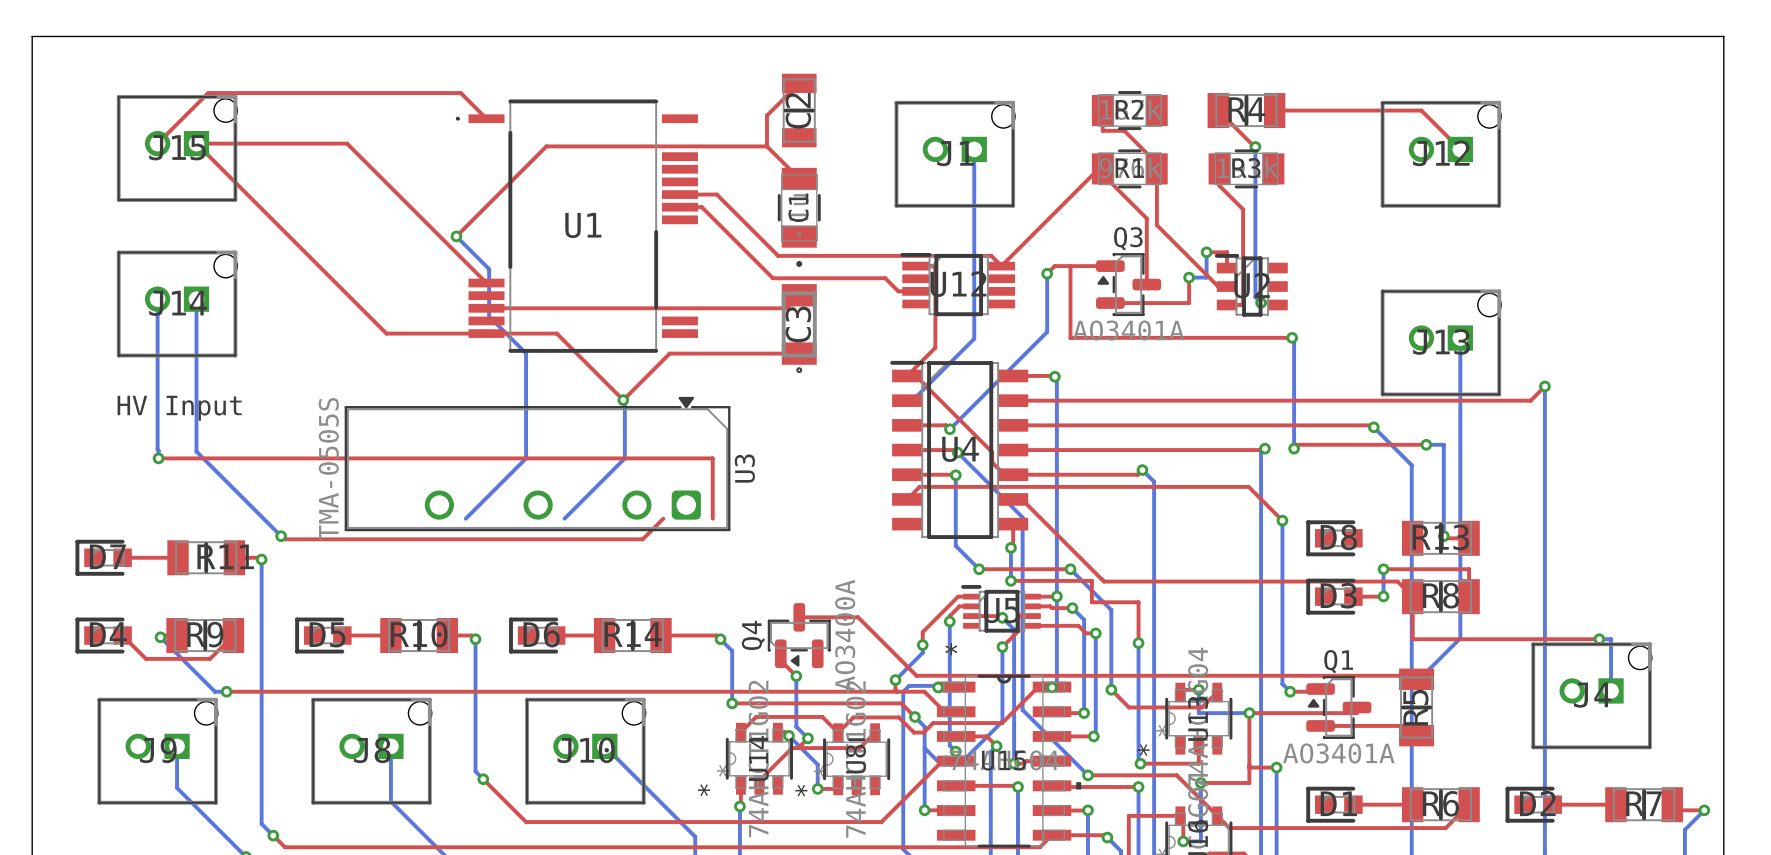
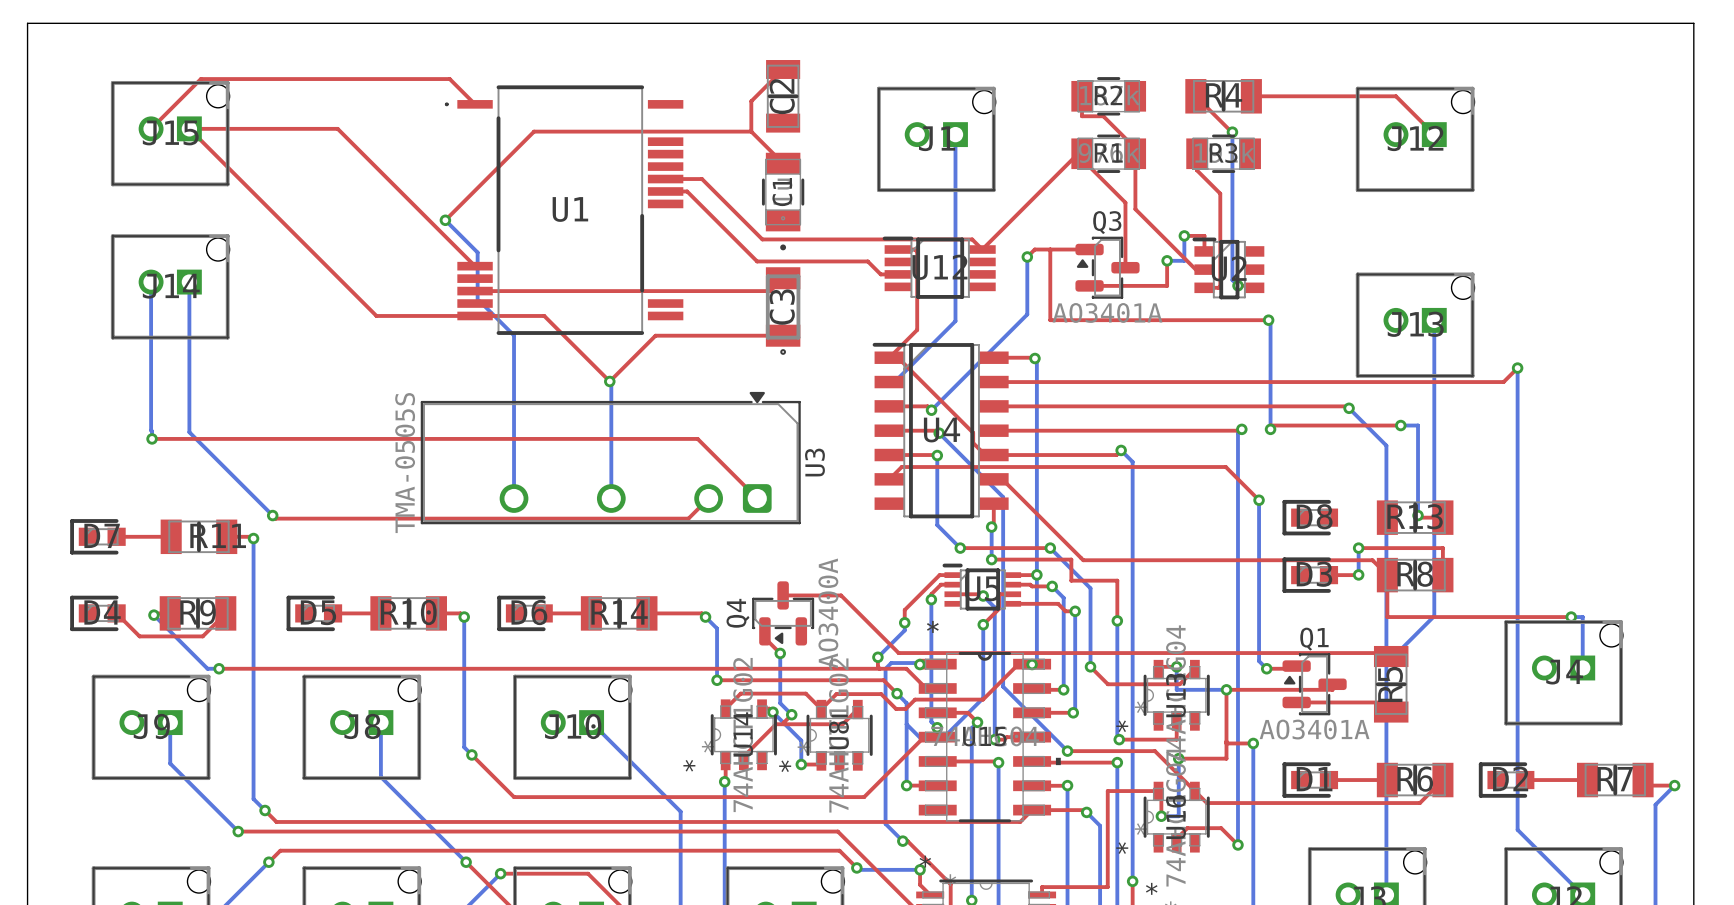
text: HV Input (179, 408) -> none
bottom track: (526, 458) (465, 518) -> (514, 438) (514, 498)
bottom track: (624, 458) (564, 518) -> (611, 438) (611, 498)
top track: (712, 458) (712, 518) -> (697, 439) (757, 498)
U3 position: (537, 464) -> (610, 458)
top track: (663, 518) (642, 539) -> (708, 498) (688, 518) (628, 518)

